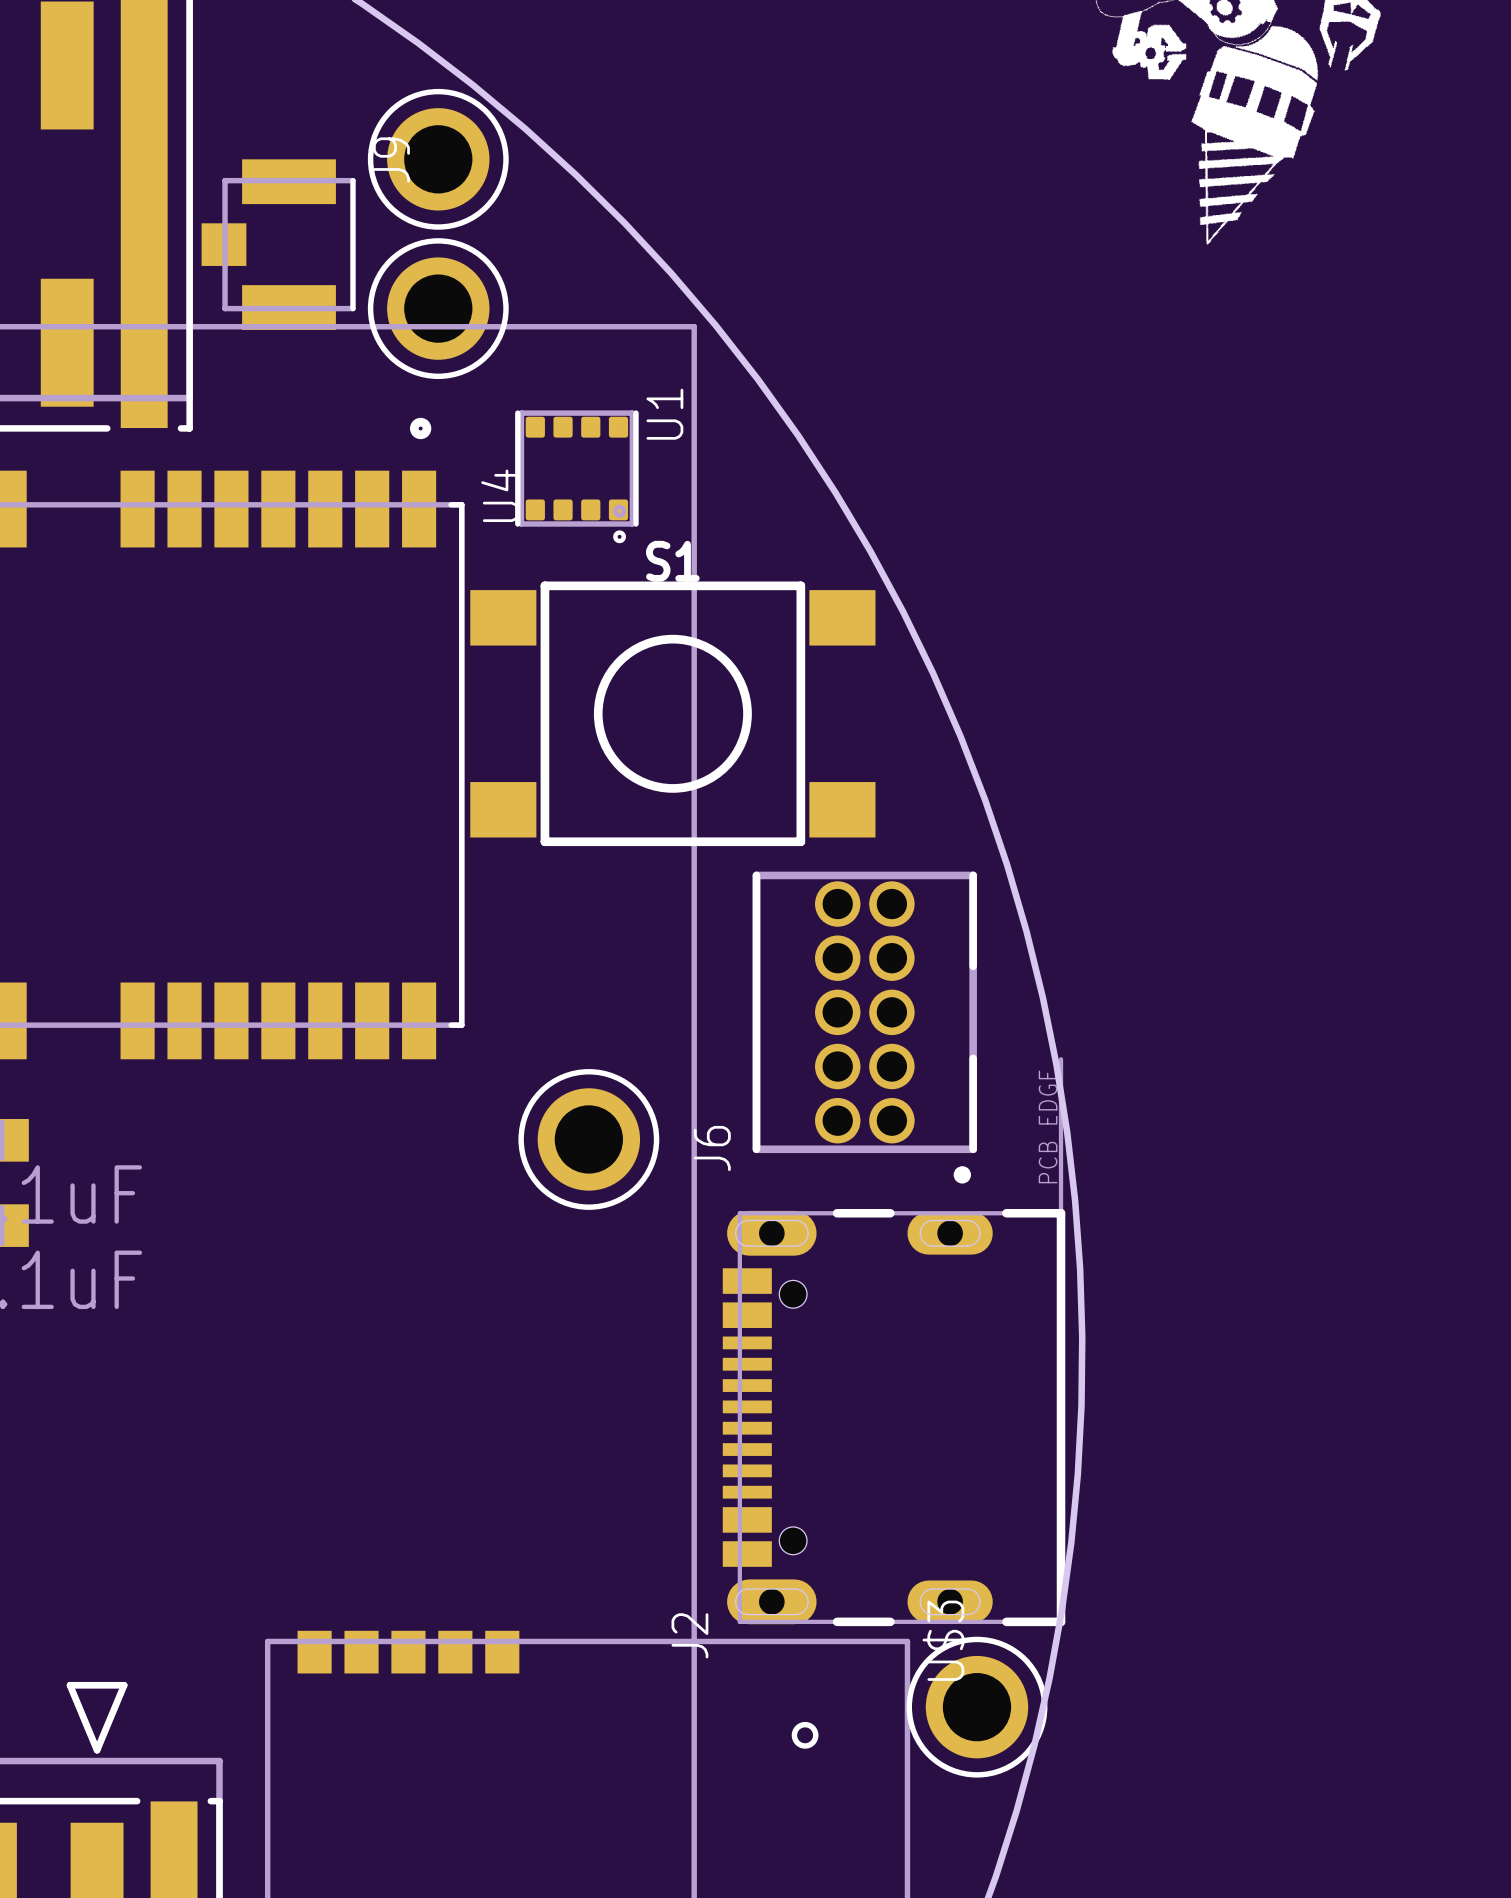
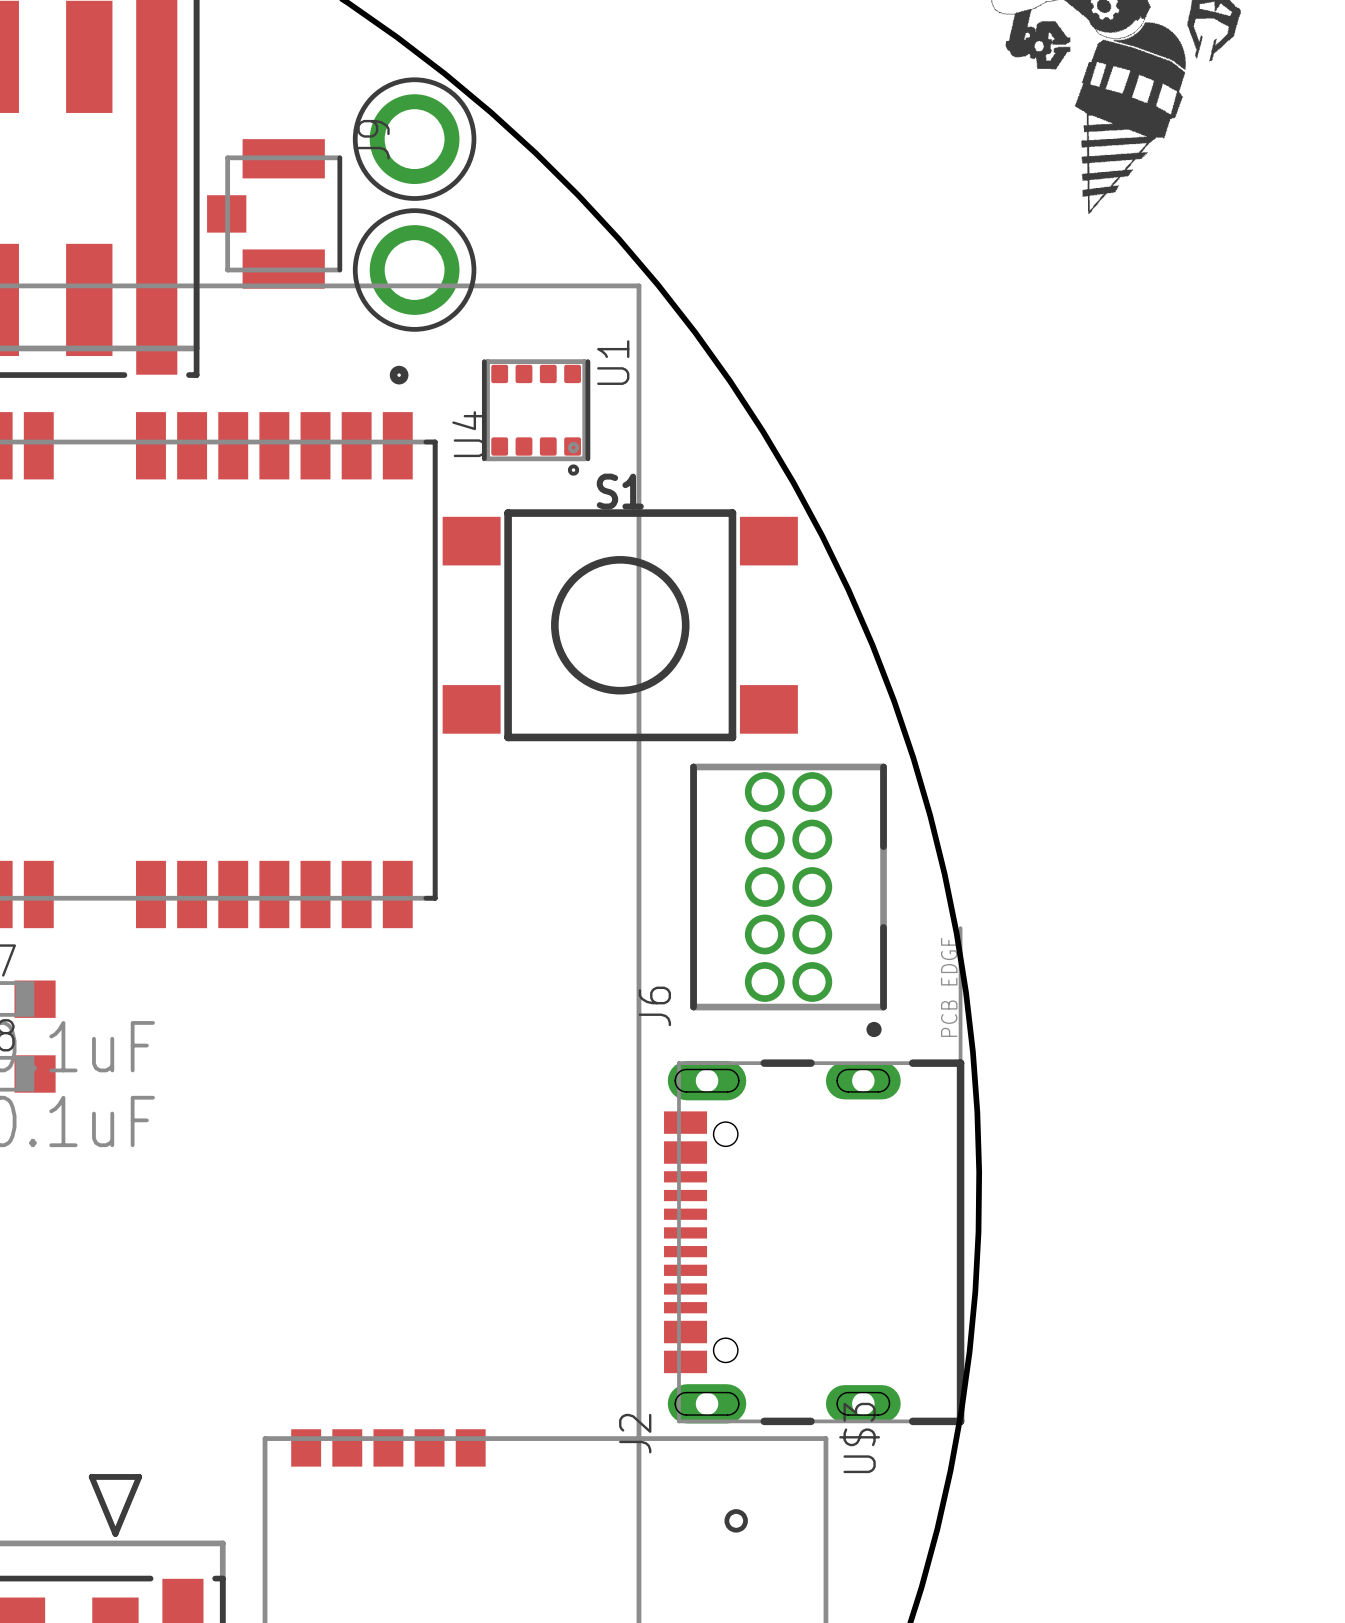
part: (588, 1139) -> none
part: (976, 1707) -> none

